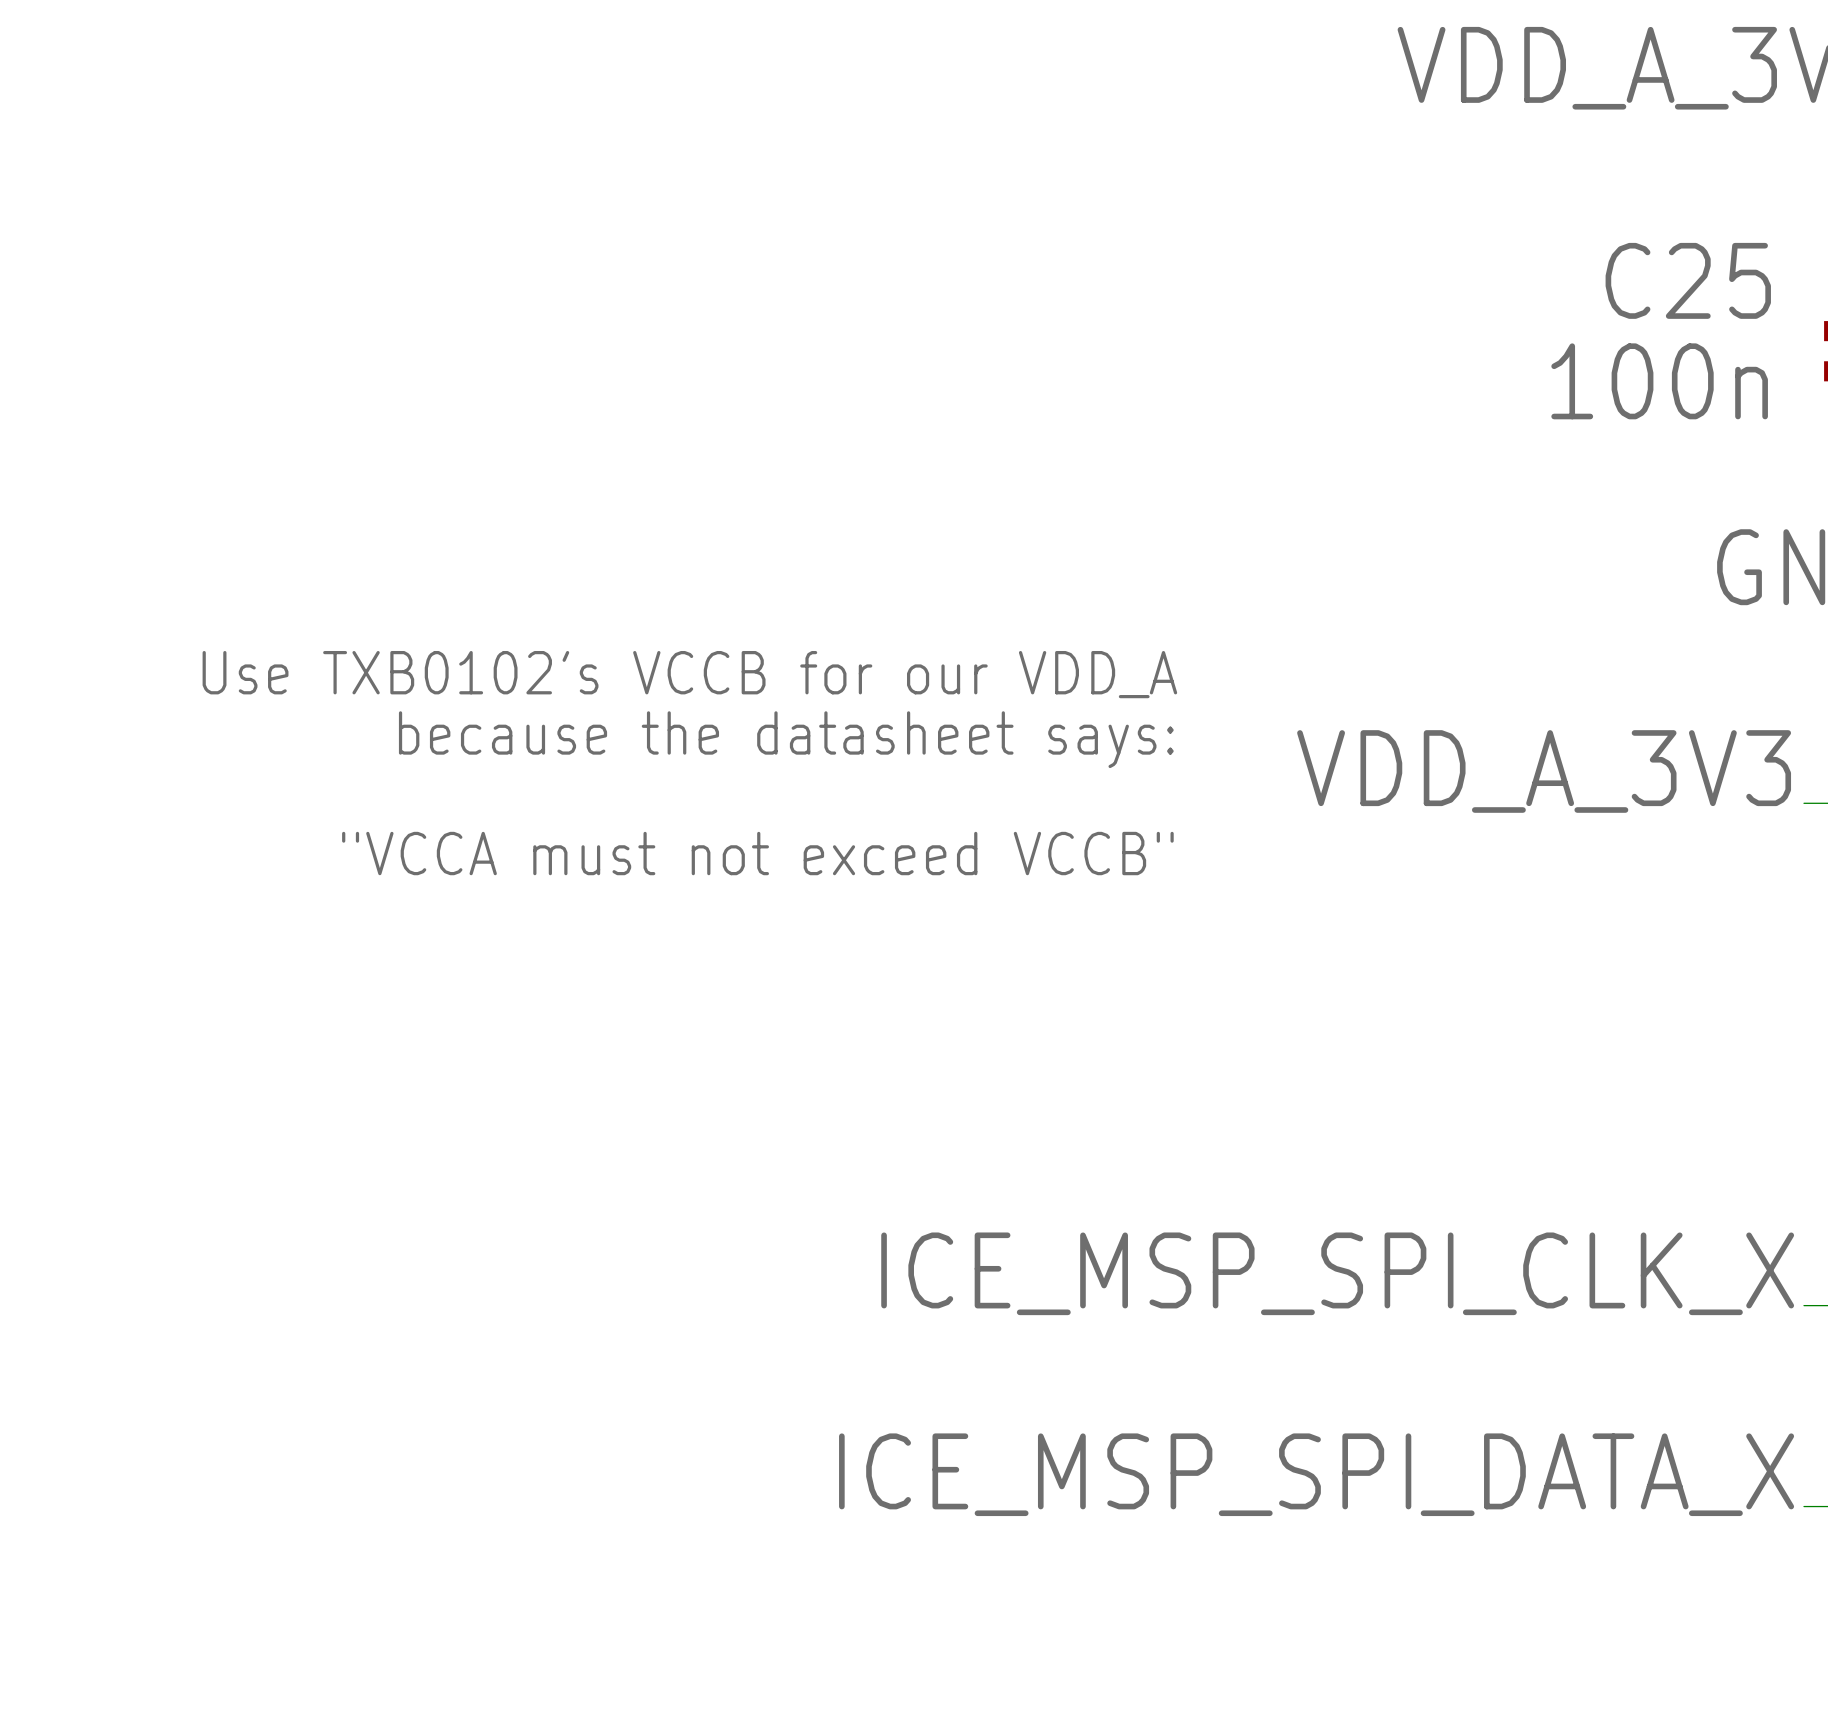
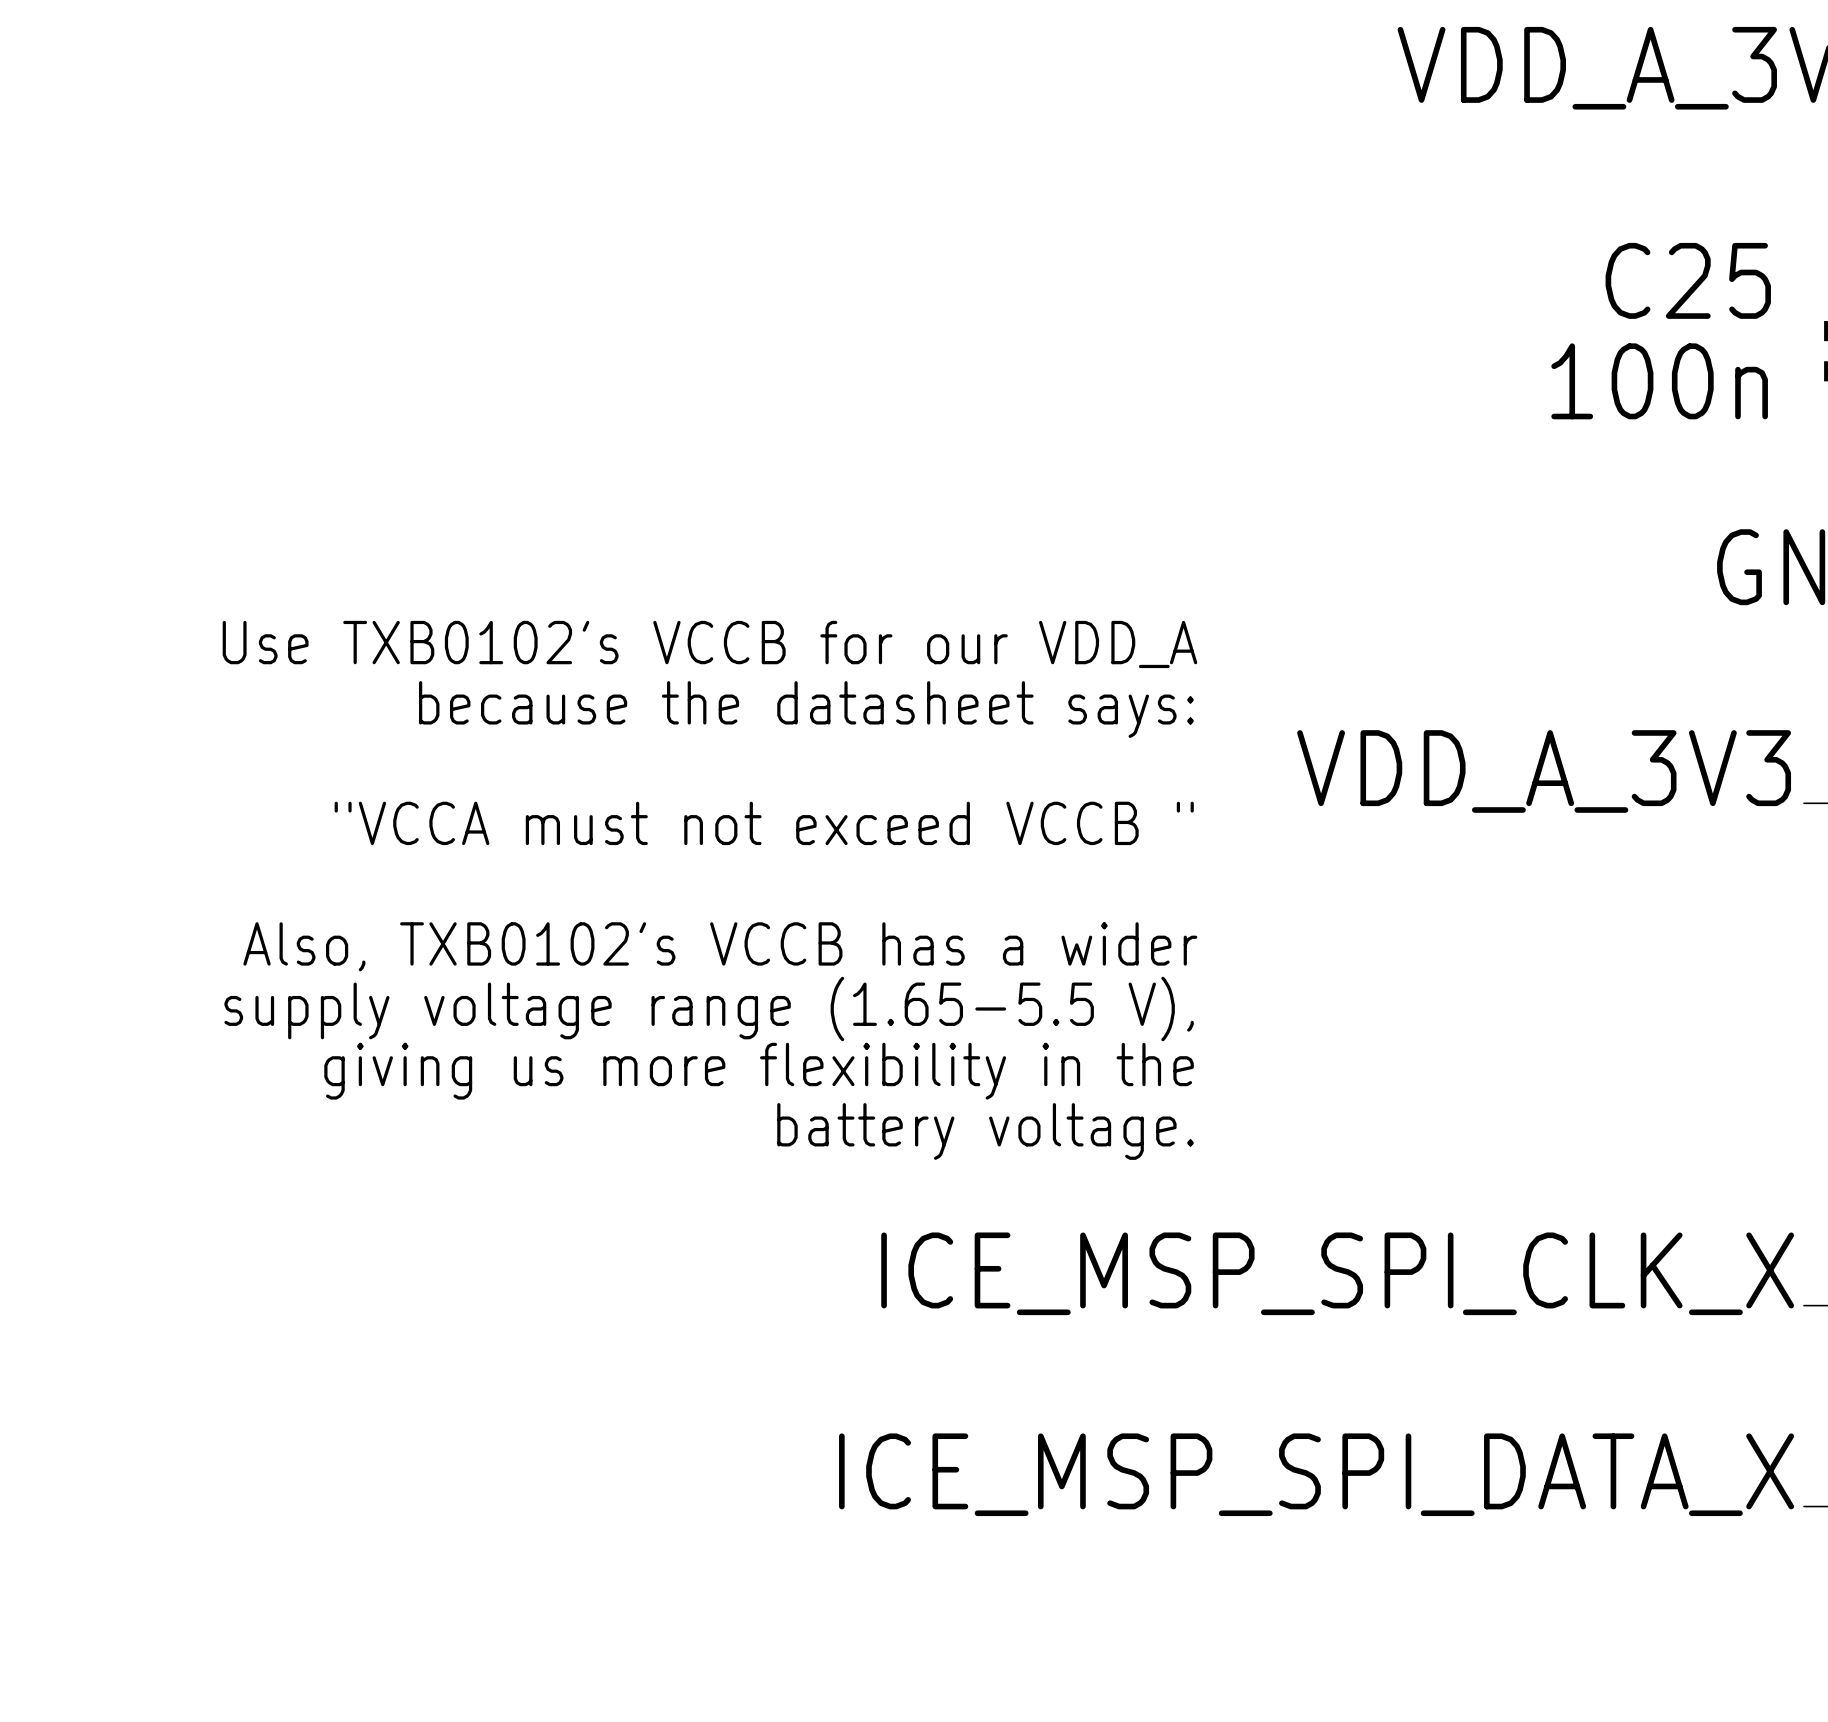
text position: Use TXB0102's VCCB for our VDD_A (689, 674) -> Use TXB0102's VCCB for our VDD_A (709, 644)
text position: because the datasheet says: (786, 739) -> because the datasheet says: (806, 709)
text: "VCCA must not exceed VCCB" (757, 853) -> "VCCA must not exceed VCCB " (764, 823)
text: none -> Also, TXB0102's VCCB has a wider (720, 946)
text: none -> supply voltage range (1.65-5.5 V), (709, 1009)
text: none -> giving us more flexibility in the (759, 1071)
text: none -> battery voltage. (985, 1131)

